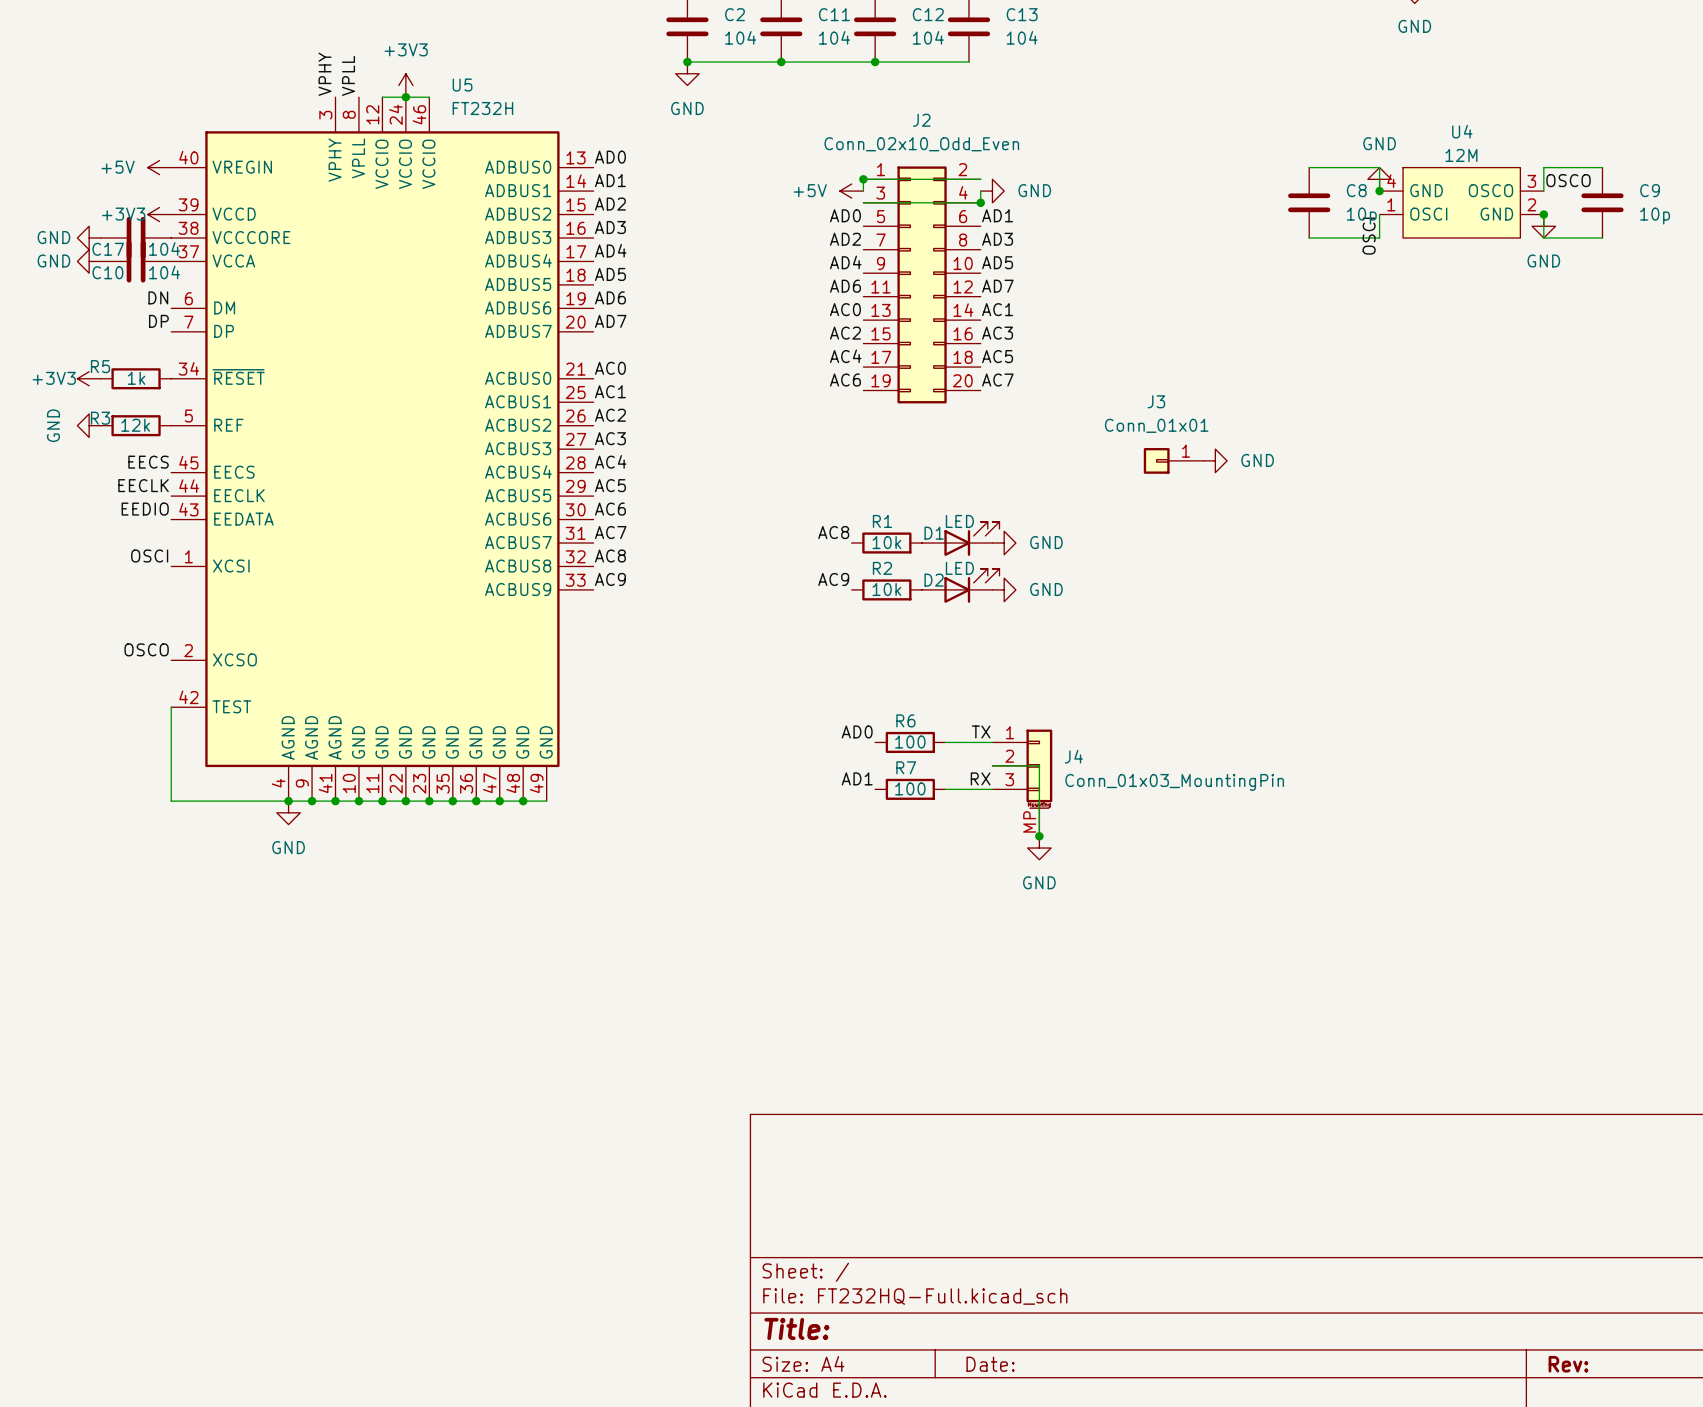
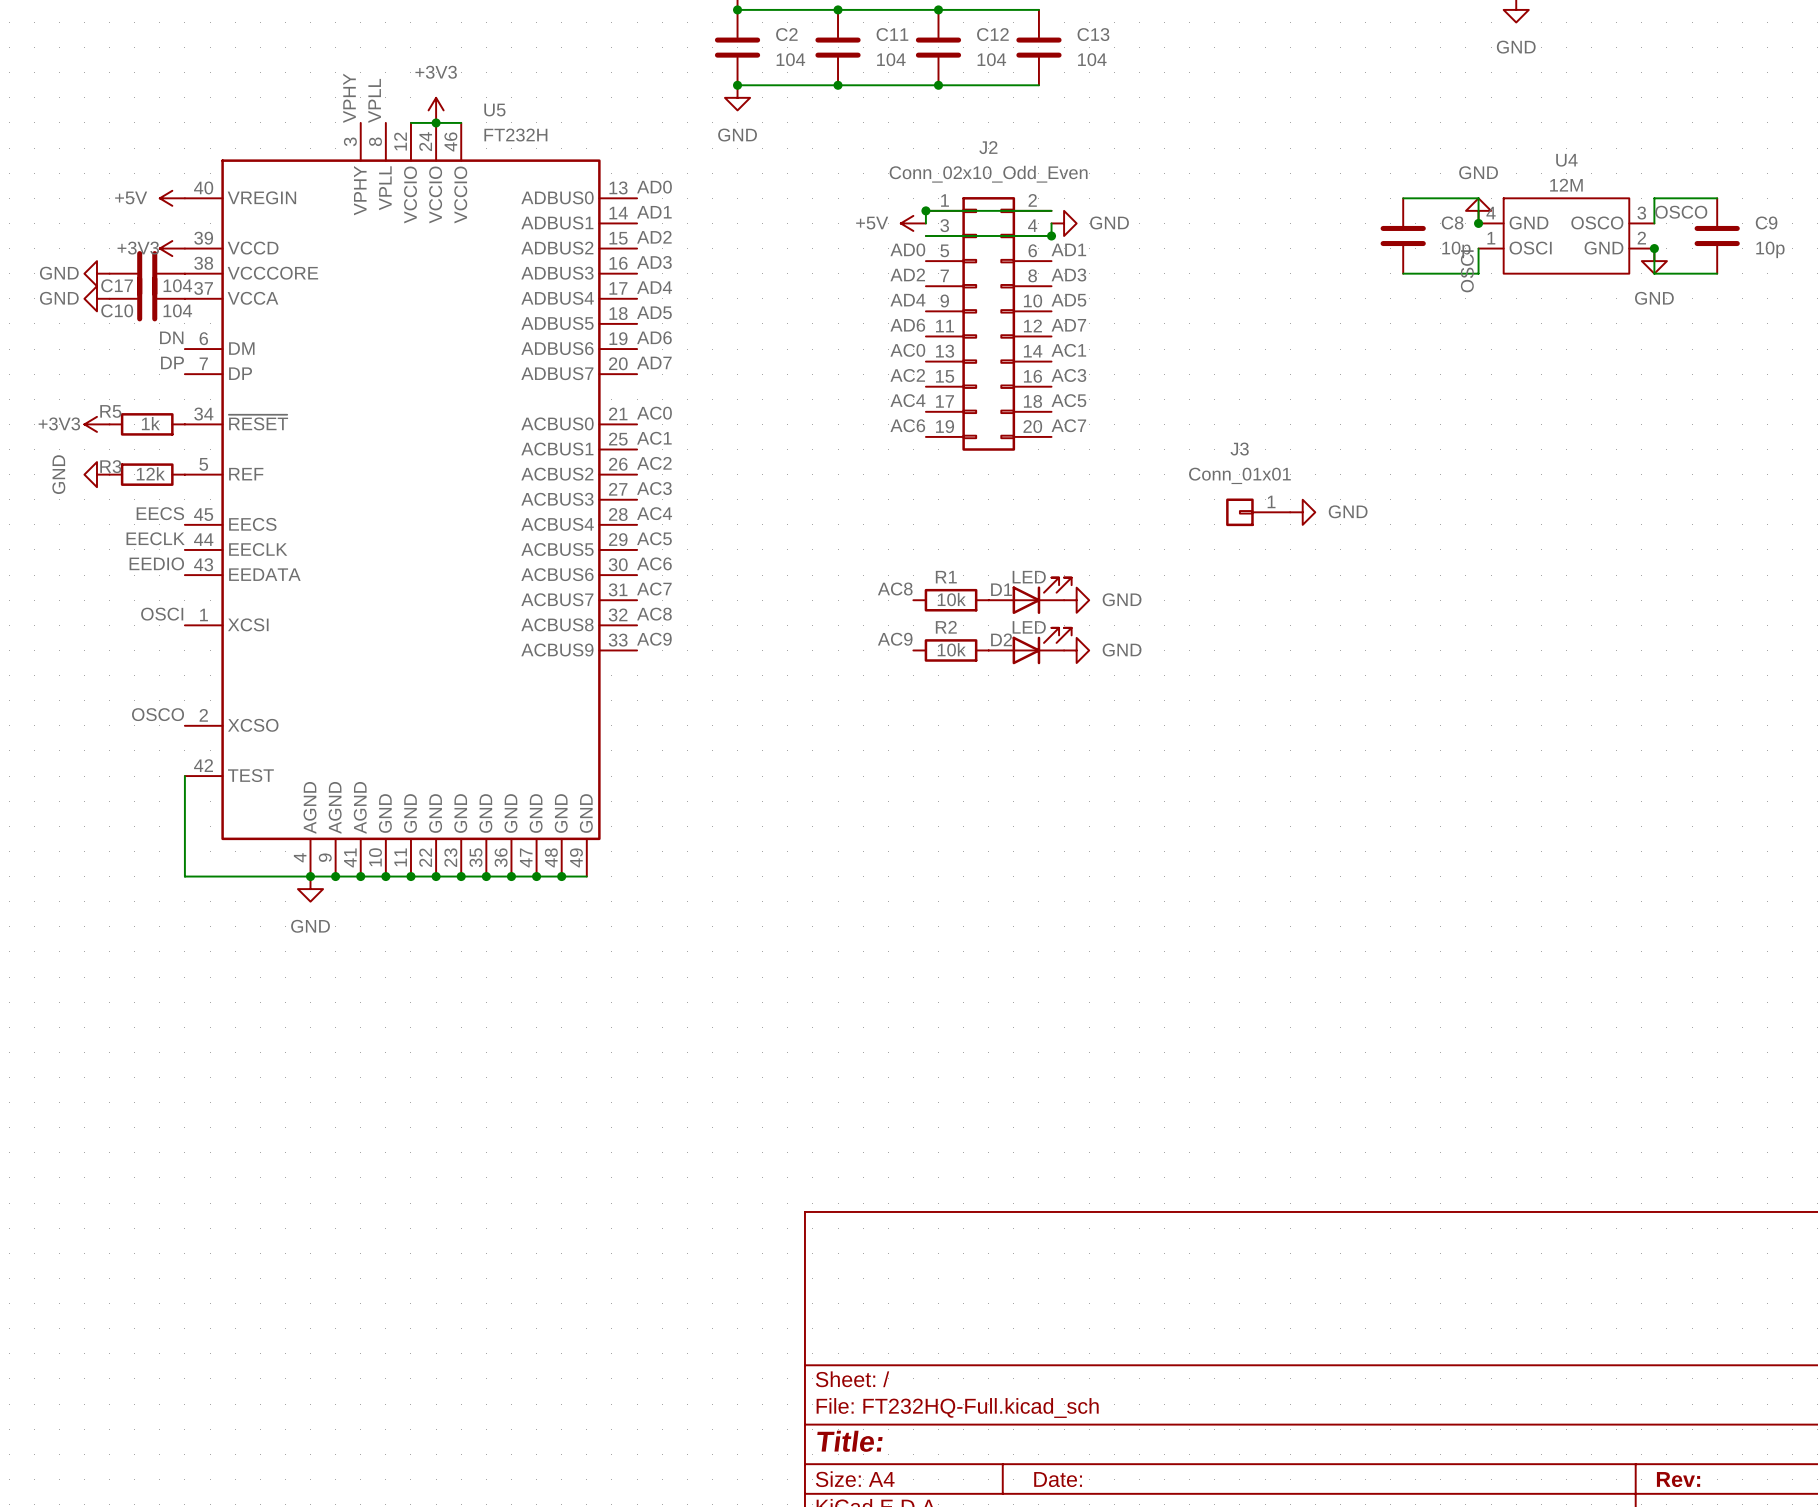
label: AD0 (857, 731) -> none
label: TX (981, 731) -> none
R6: 100 (910, 742) -> none
wire: (945, 742) (992, 742) -> none
wire: (992, 765) (1039, 765) (1039, 836) -> none
label: AD1 (857, 778) -> none
label: RX (980, 778) -> none
J4: Conn_01x03_MountingPin (1022, 782) -> none
R7: 100 (910, 789) -> none
wire: (945, 789) (992, 789) -> none
junction: (1039, 836) -> none
power symbol: GND (1039, 848) -> none

